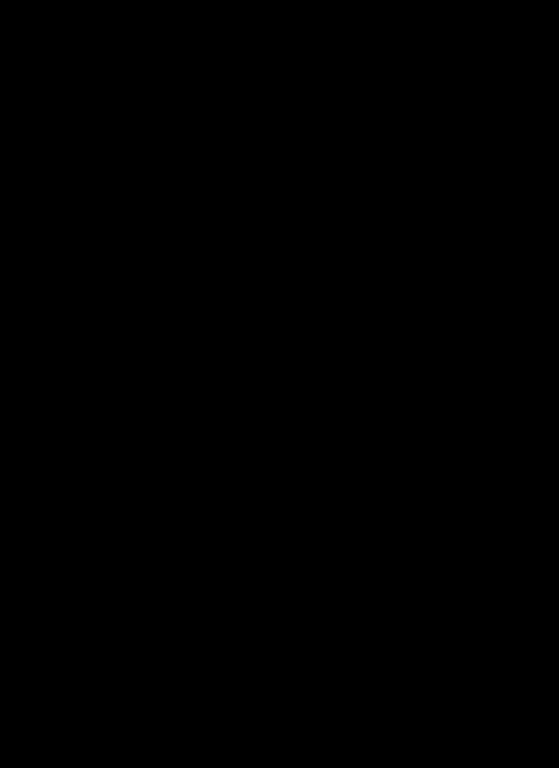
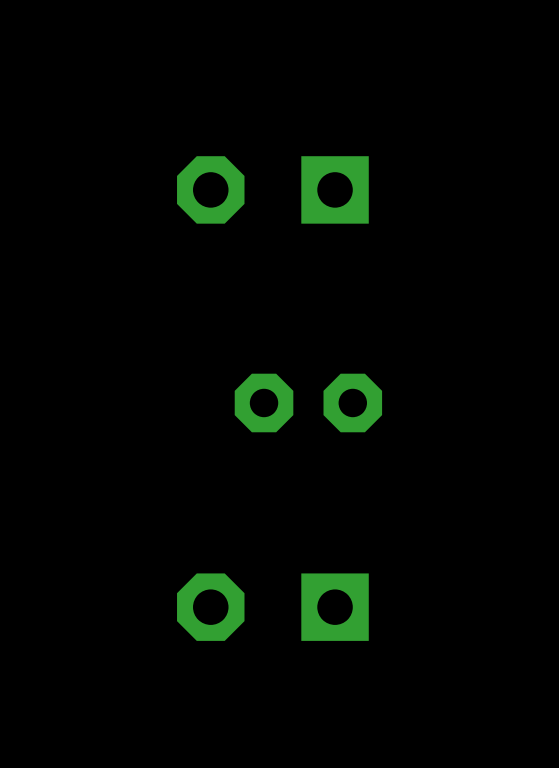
part: none -> (272, 189)
part: none -> (308, 402)
part: none -> (272, 607)

